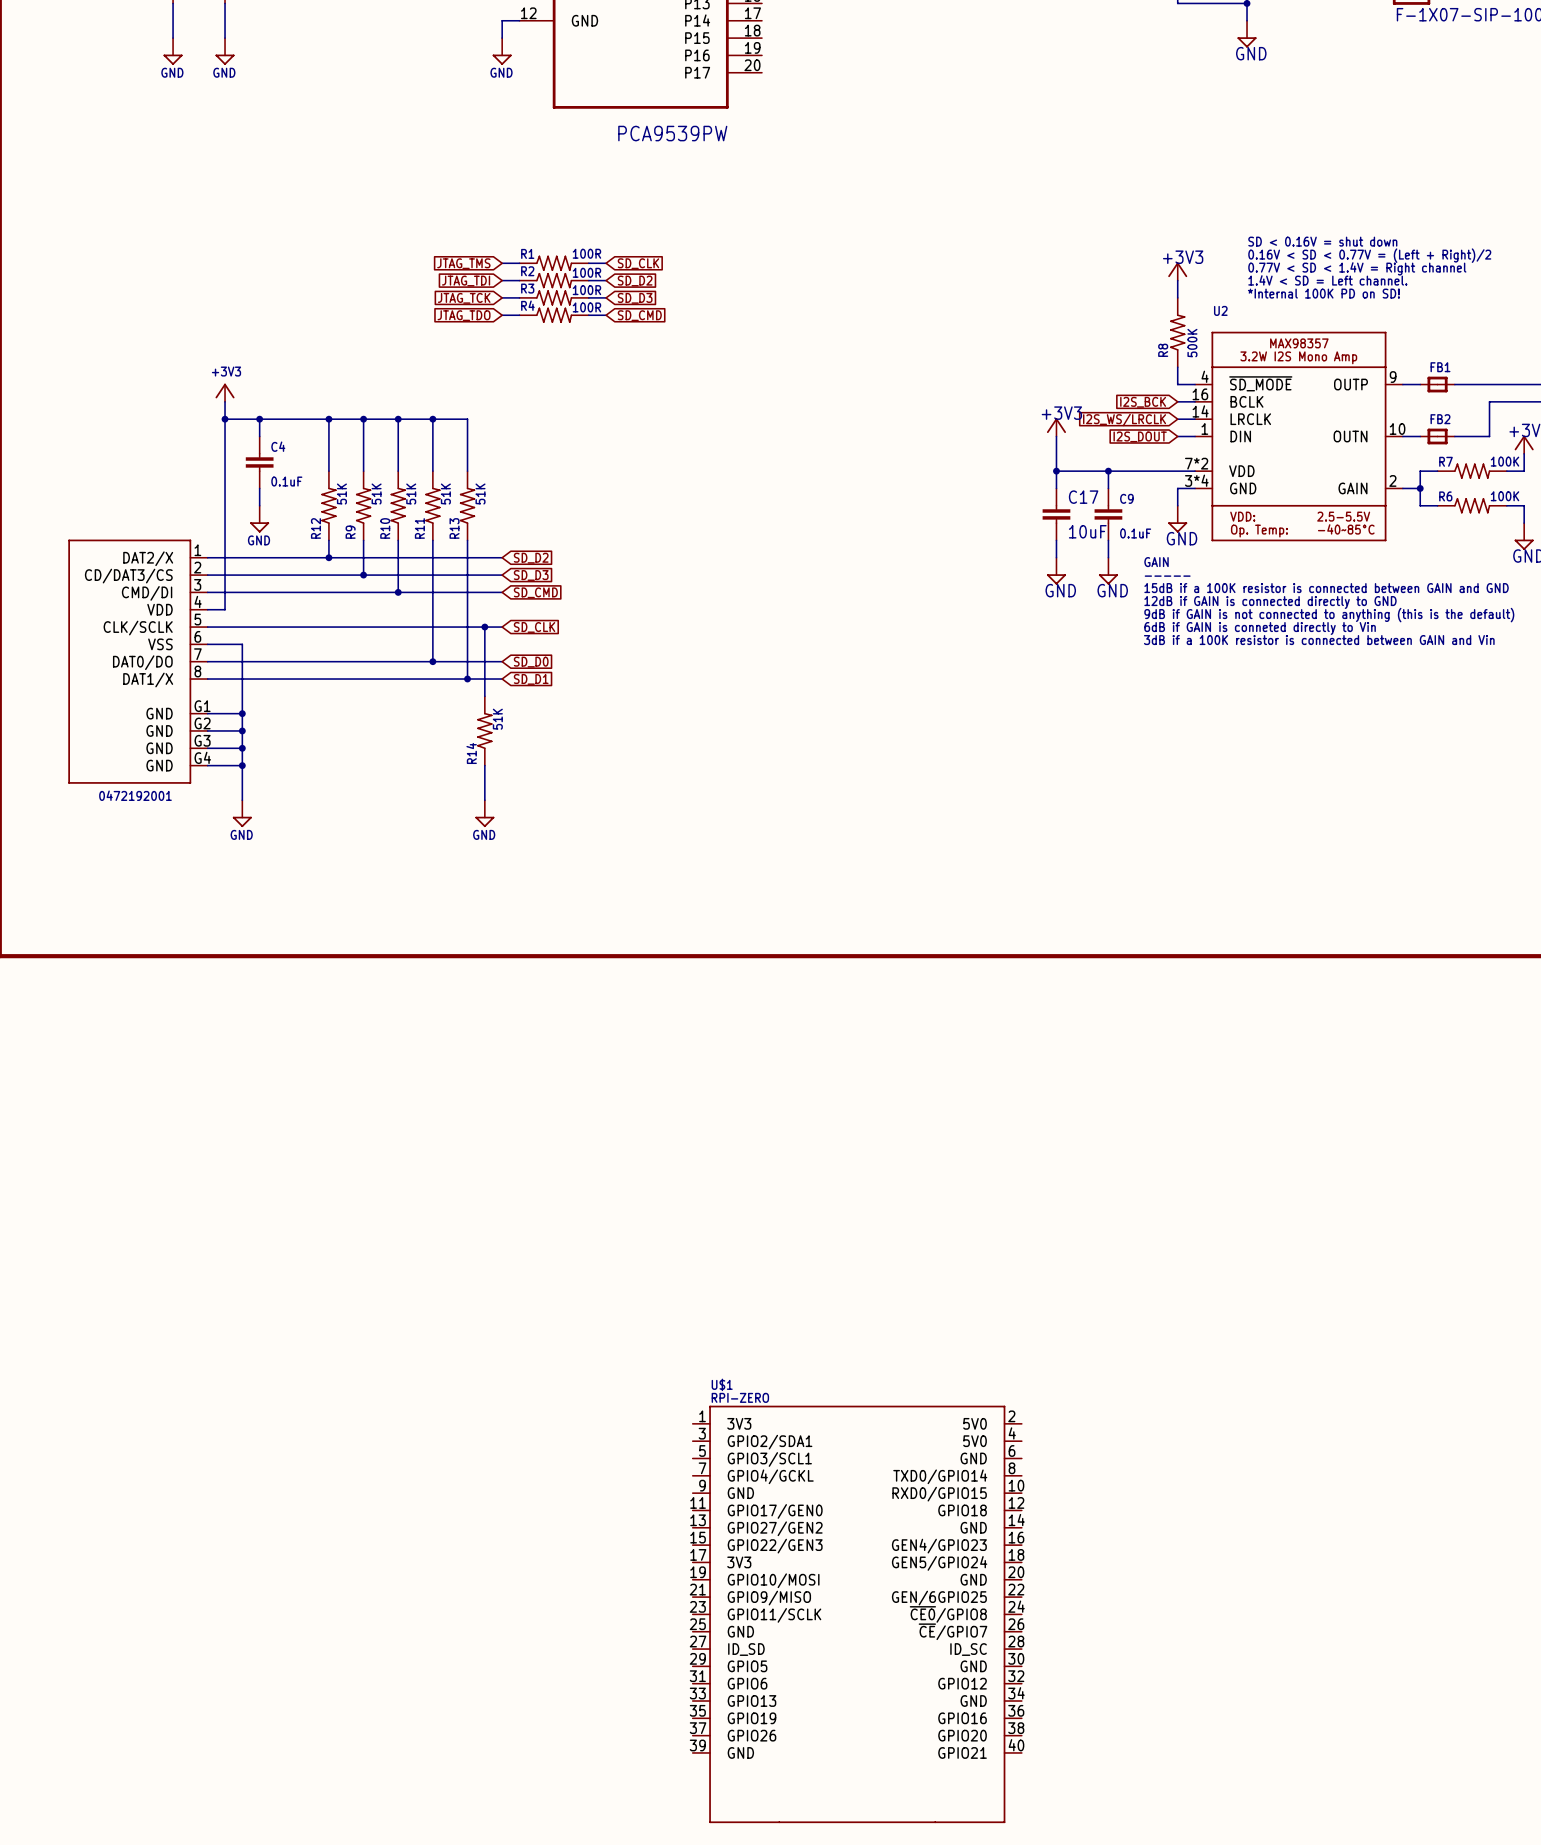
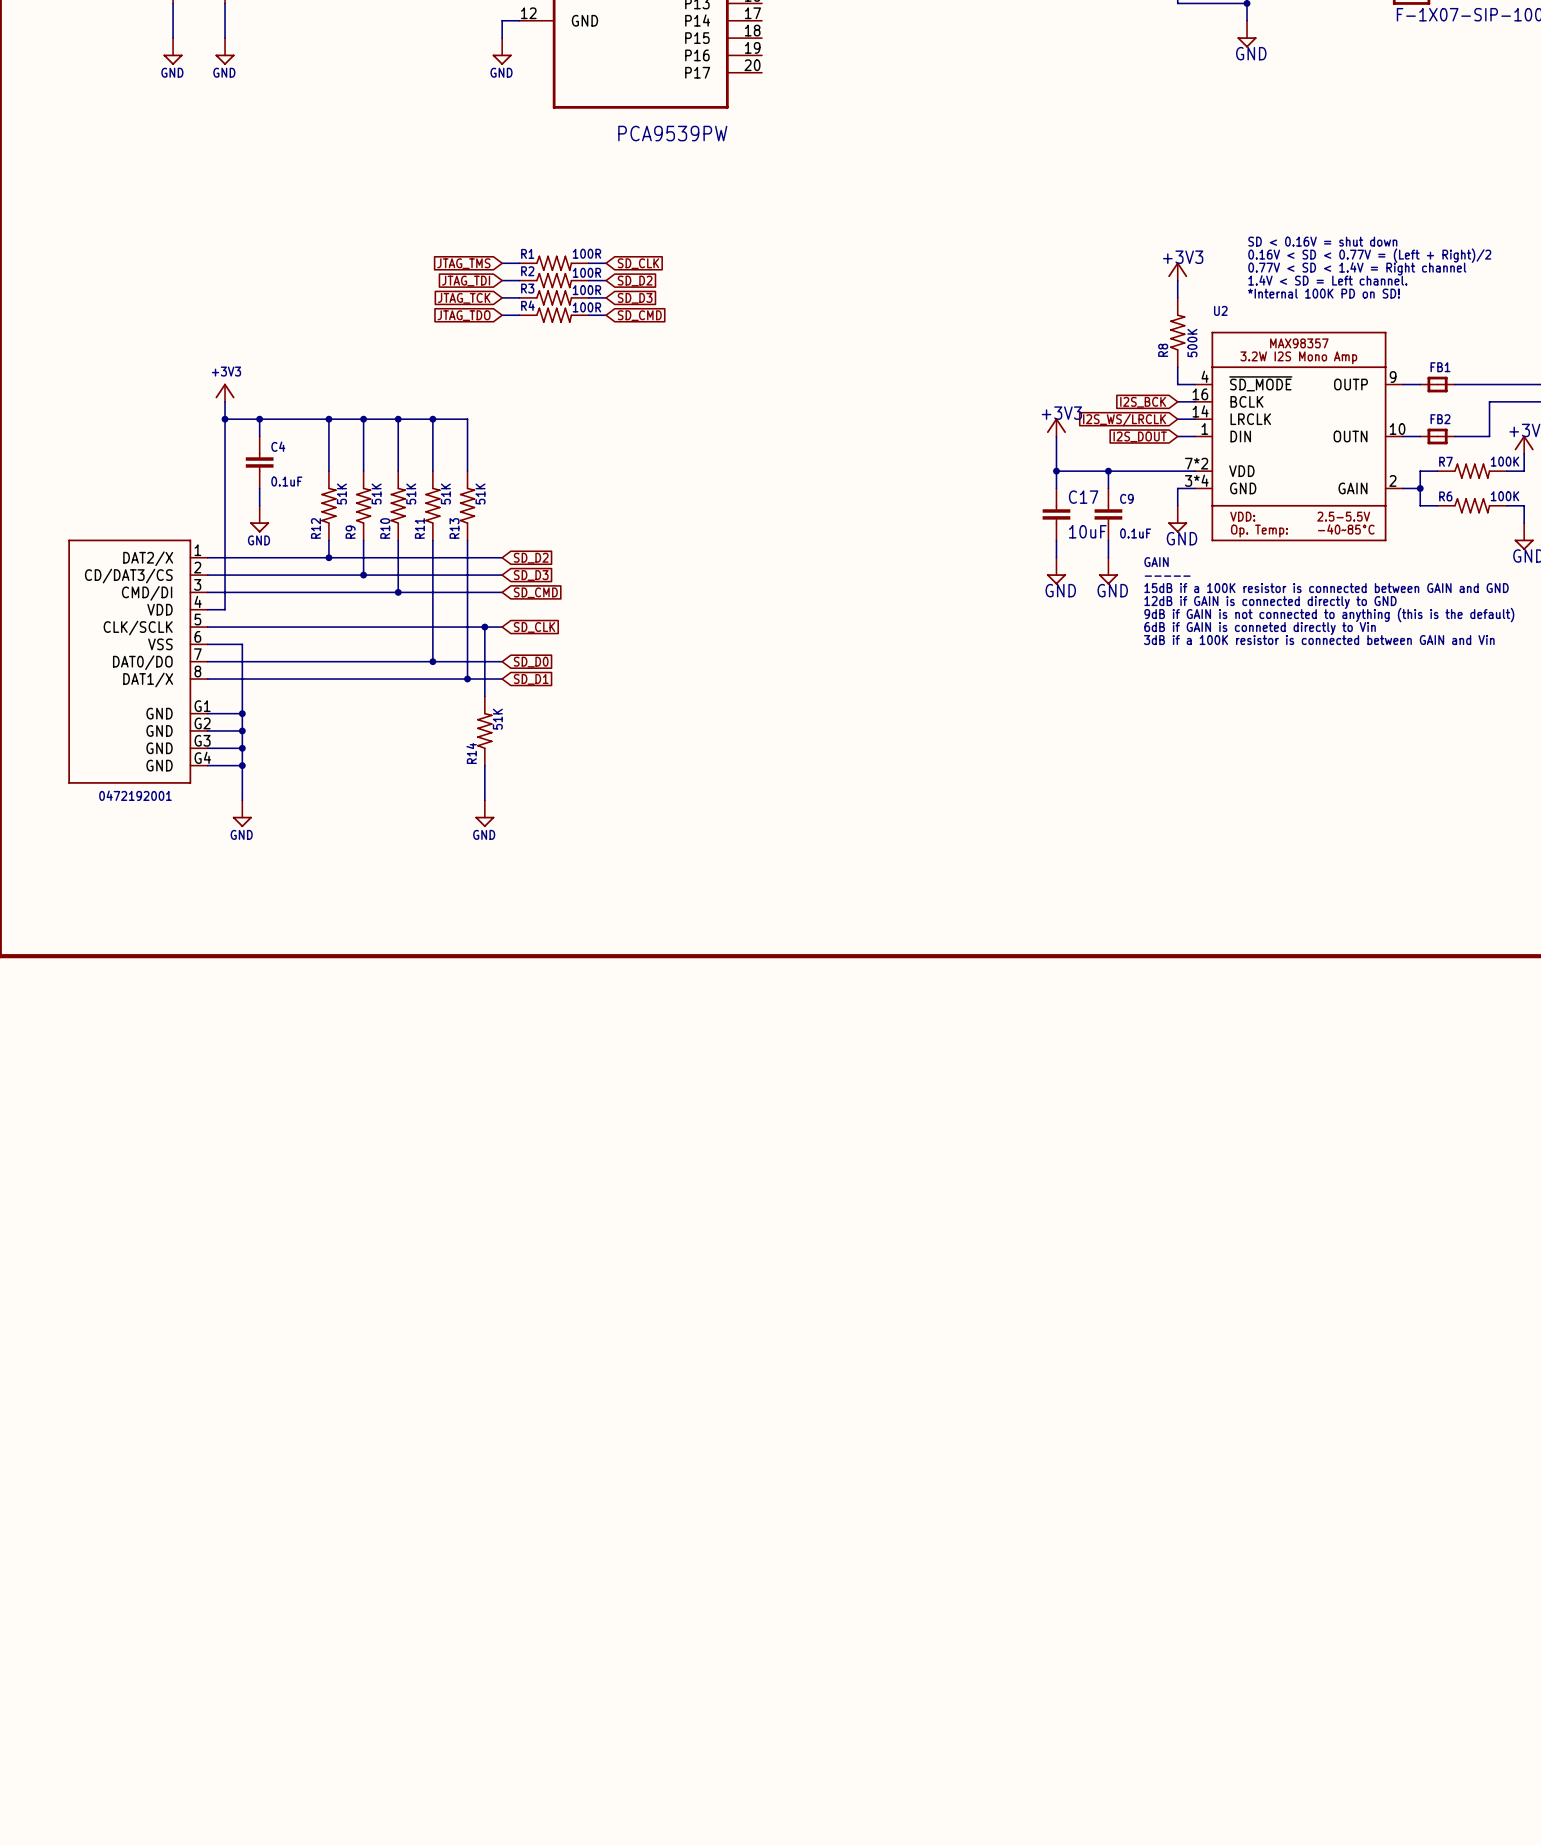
U$1: RPI-ZERO (857, 1614) -> none

